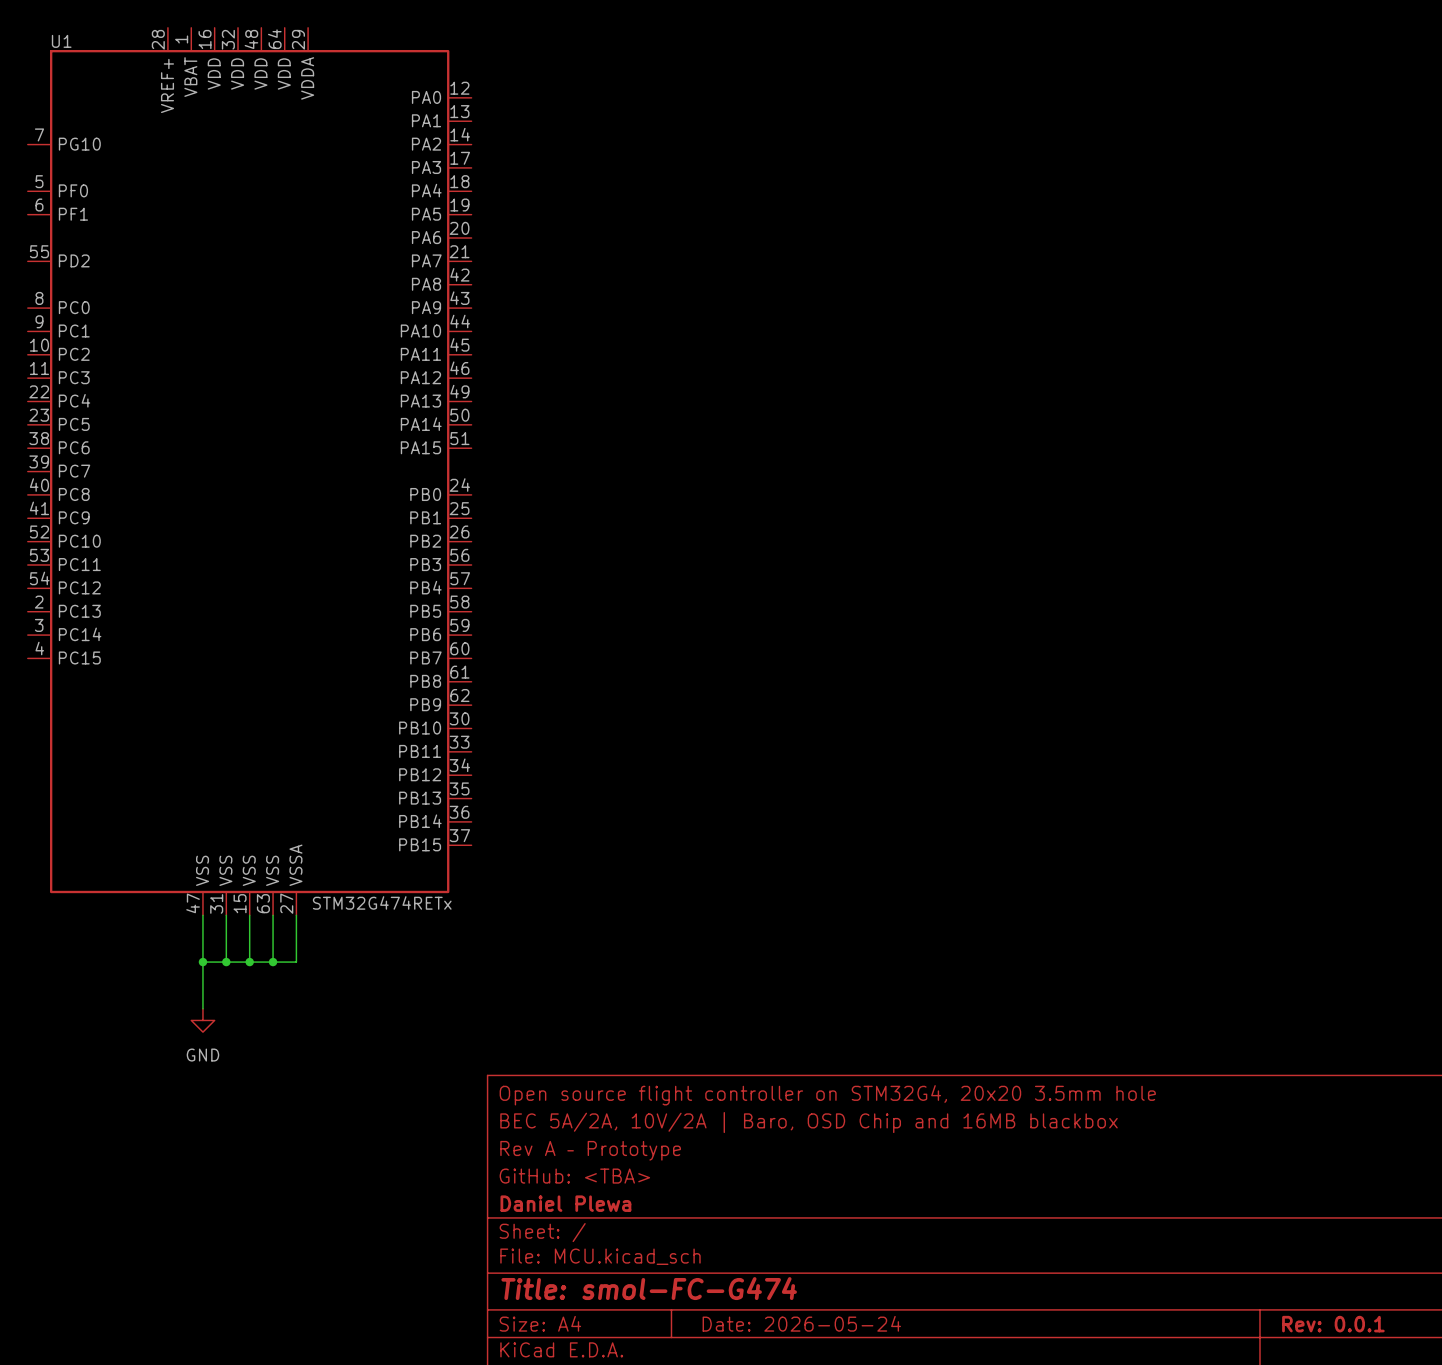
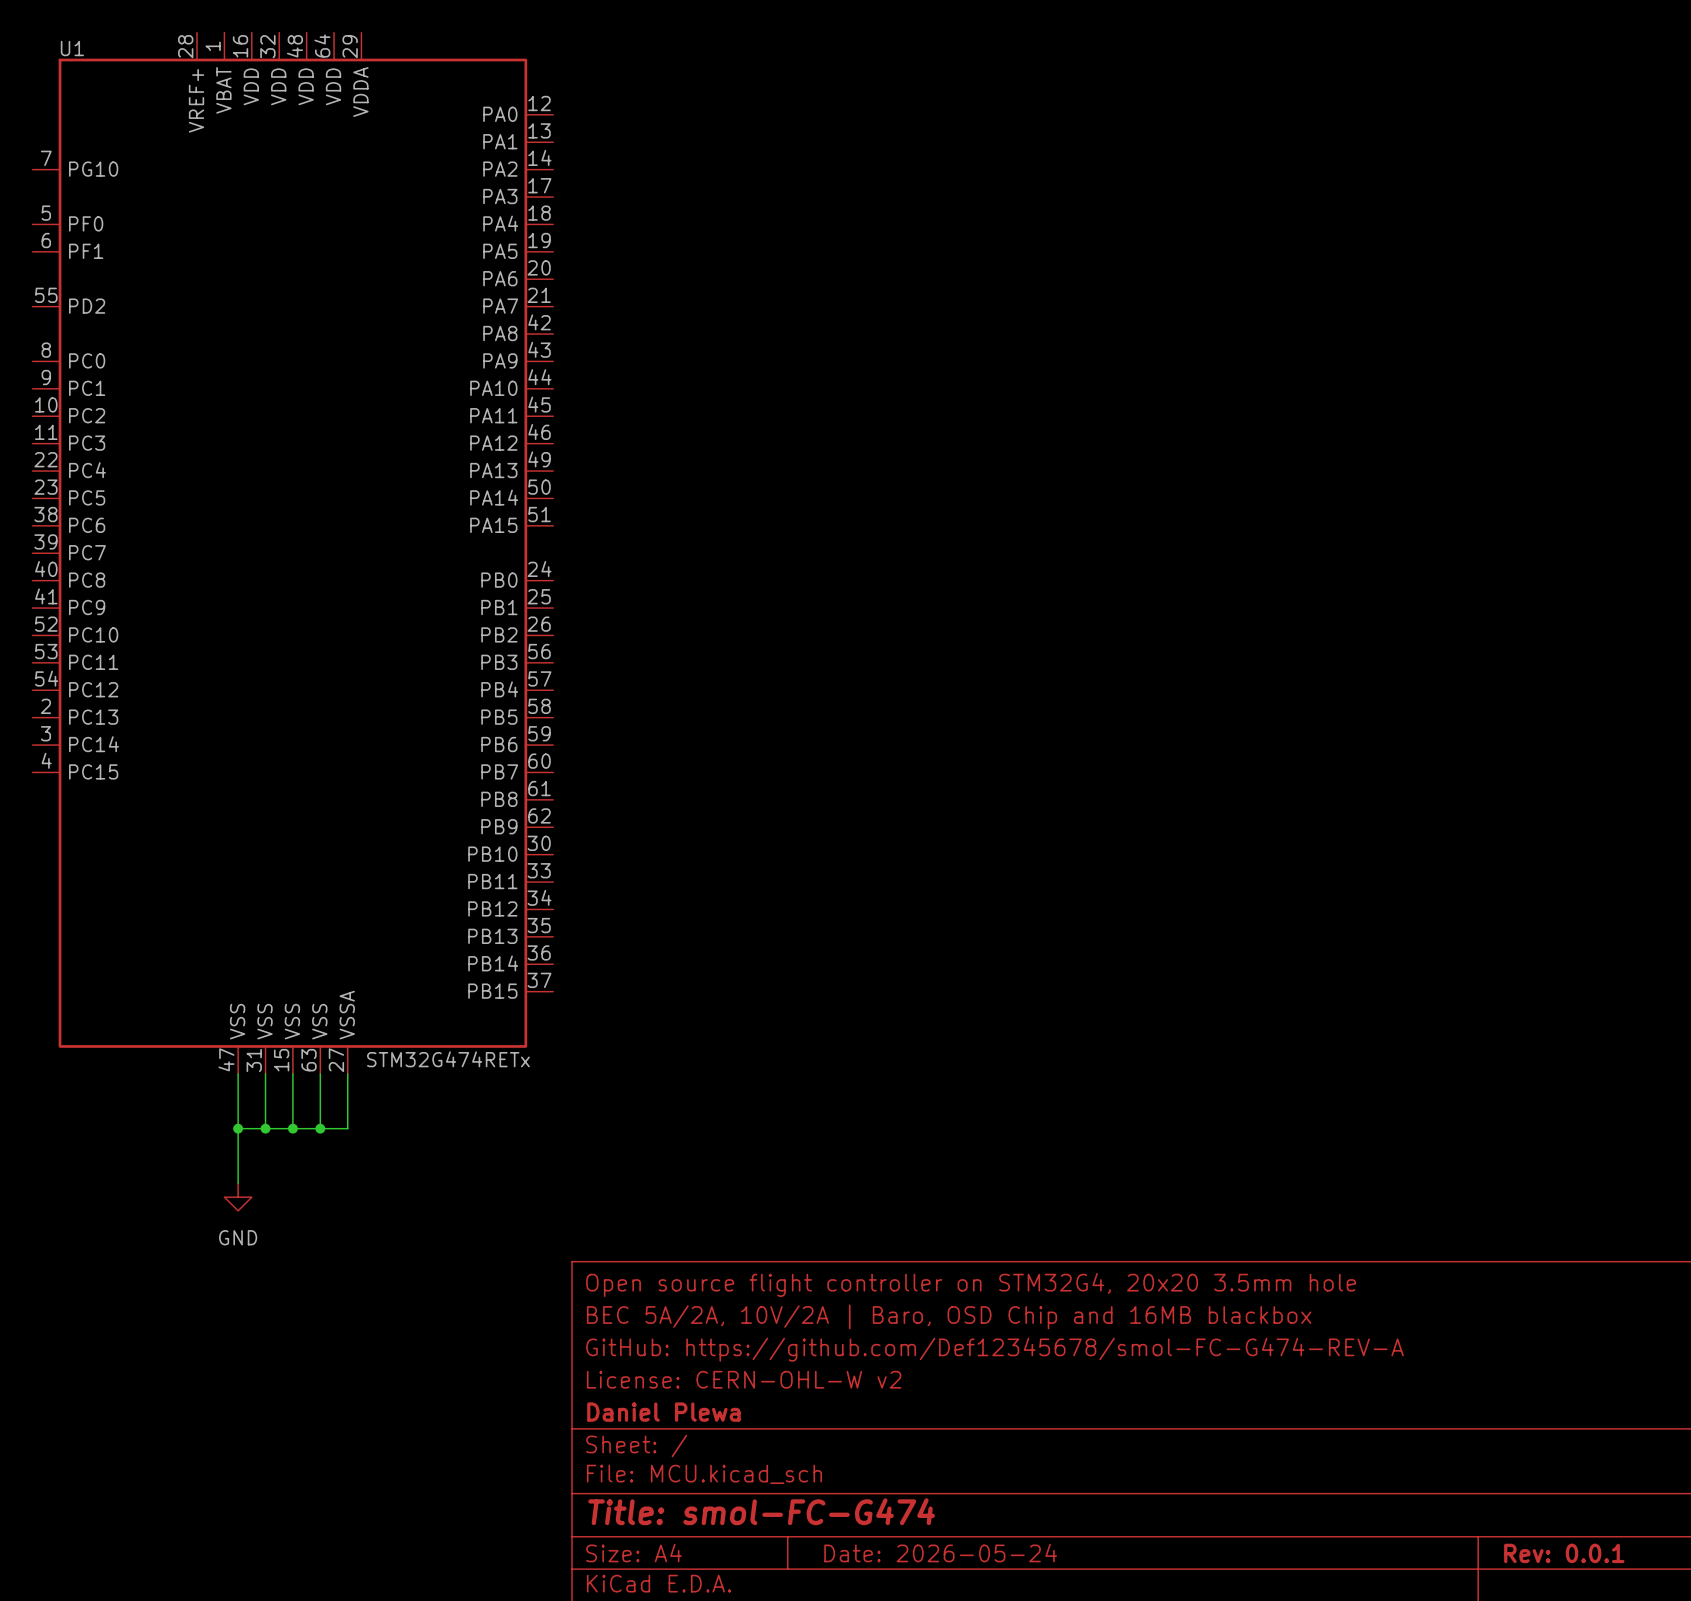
title block: Rev A – Prototype (590, 1150) -> GitHub: https://github.com/Def12345678/smol-FC-G474-REV-A (994, 1349)
title block: GitHub: <TBA> (574, 1176) -> License: CERN-OHL-W v2 (744, 1379)

